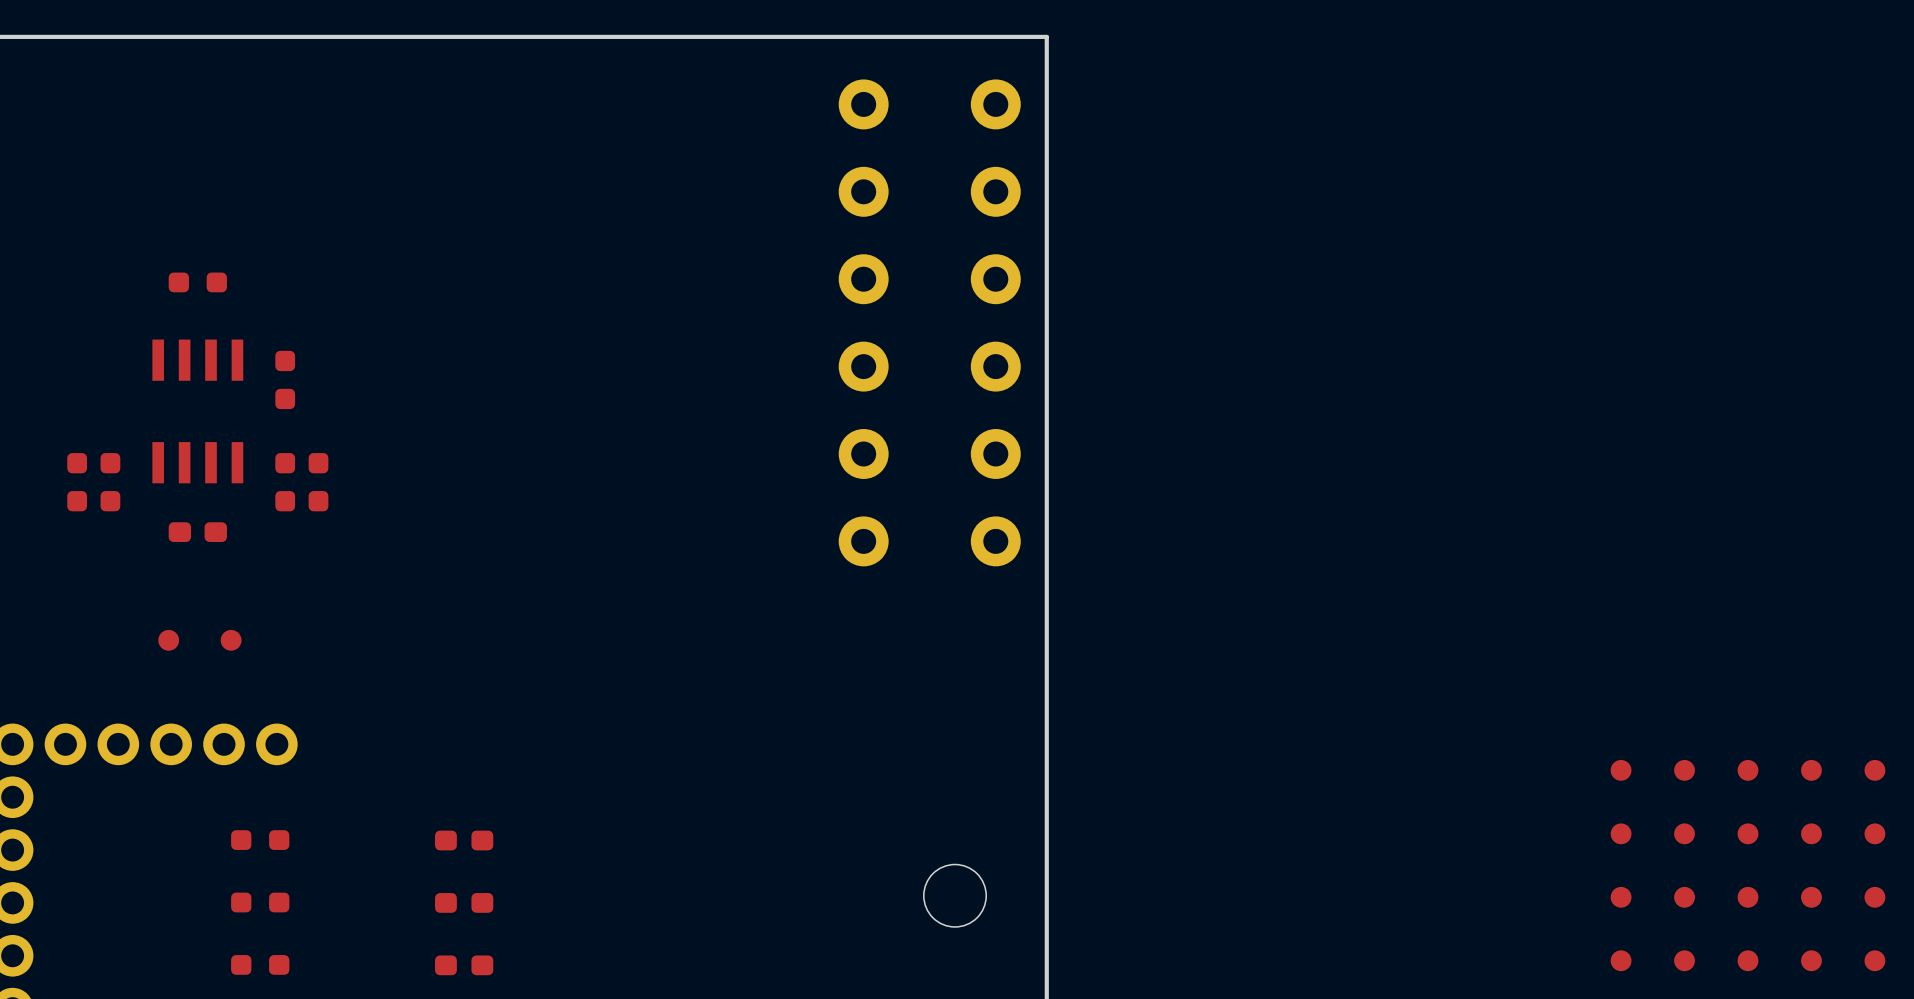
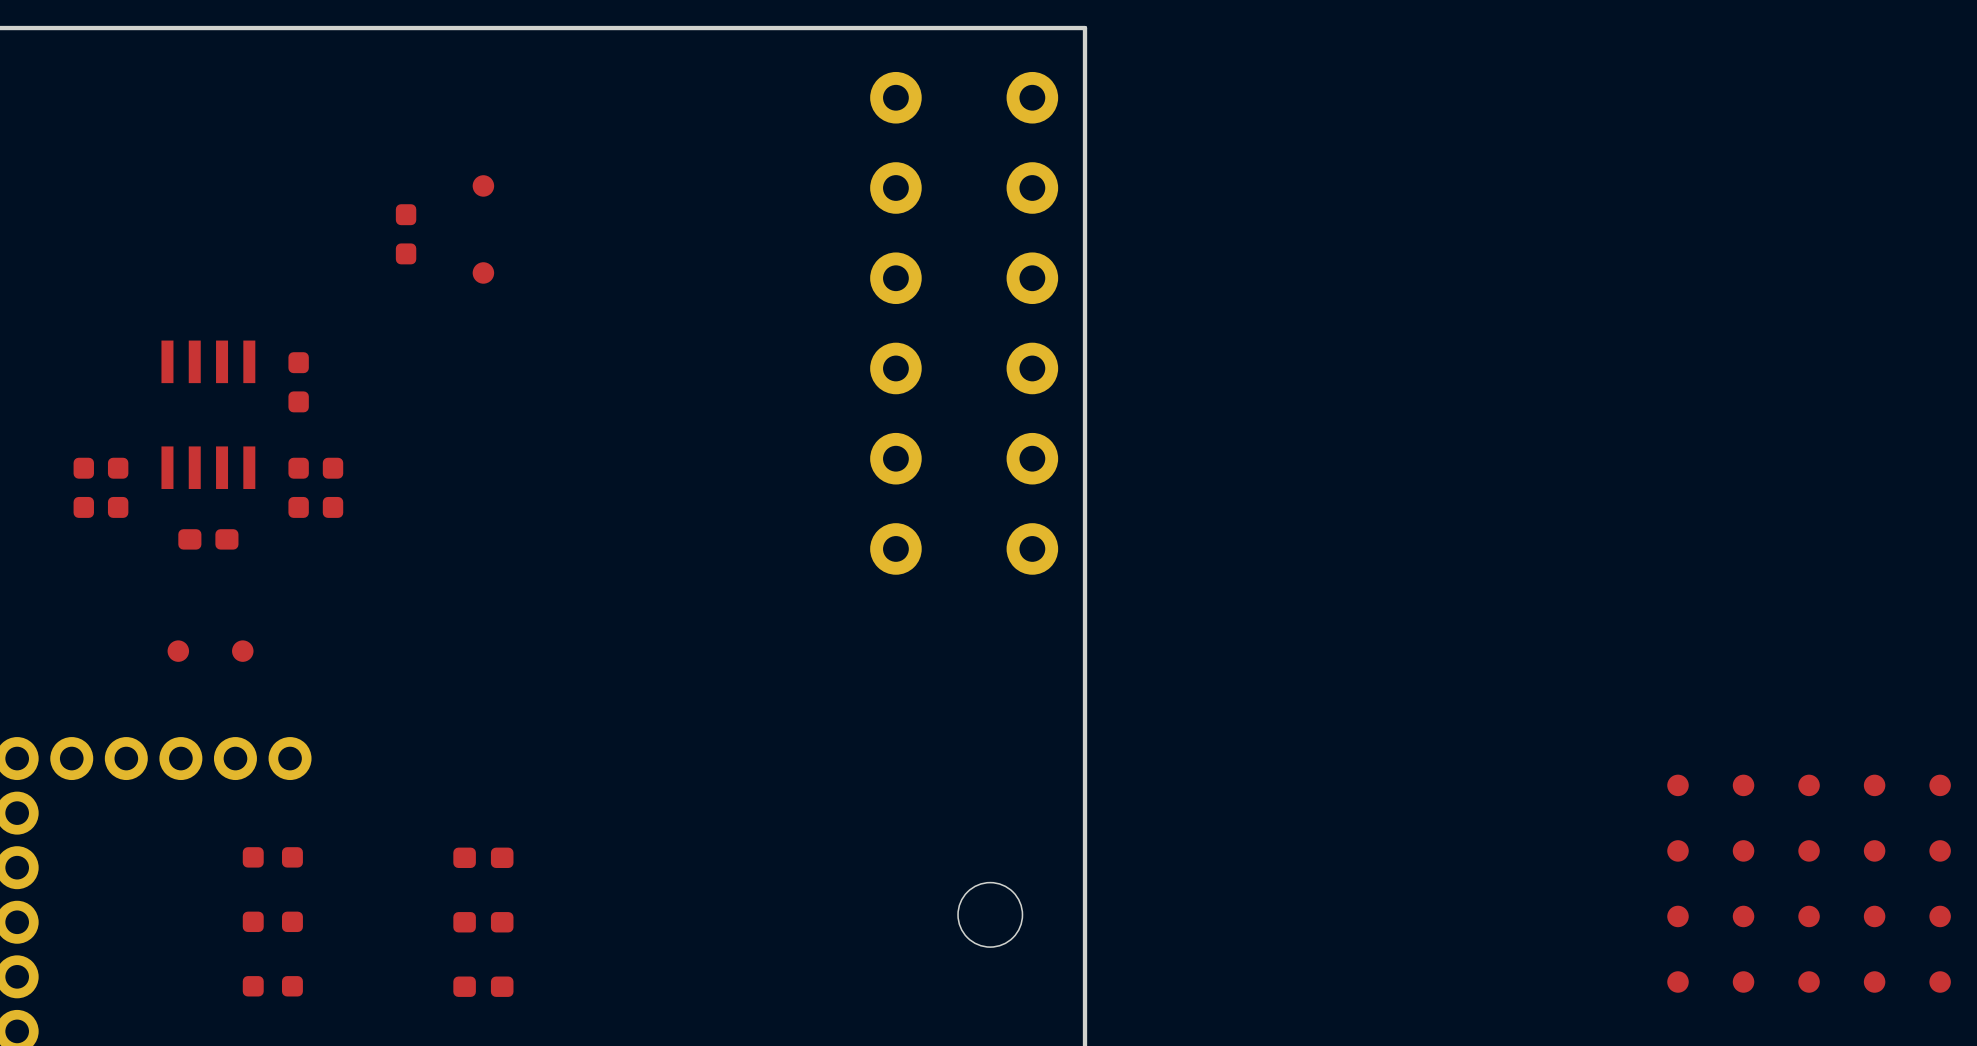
part: none -> (483, 185)
part: none -> (483, 272)
part rotation: 0° (197, 282) -> 90° clockwise (406, 234)
part position: (197, 282) -> (406, 234)

